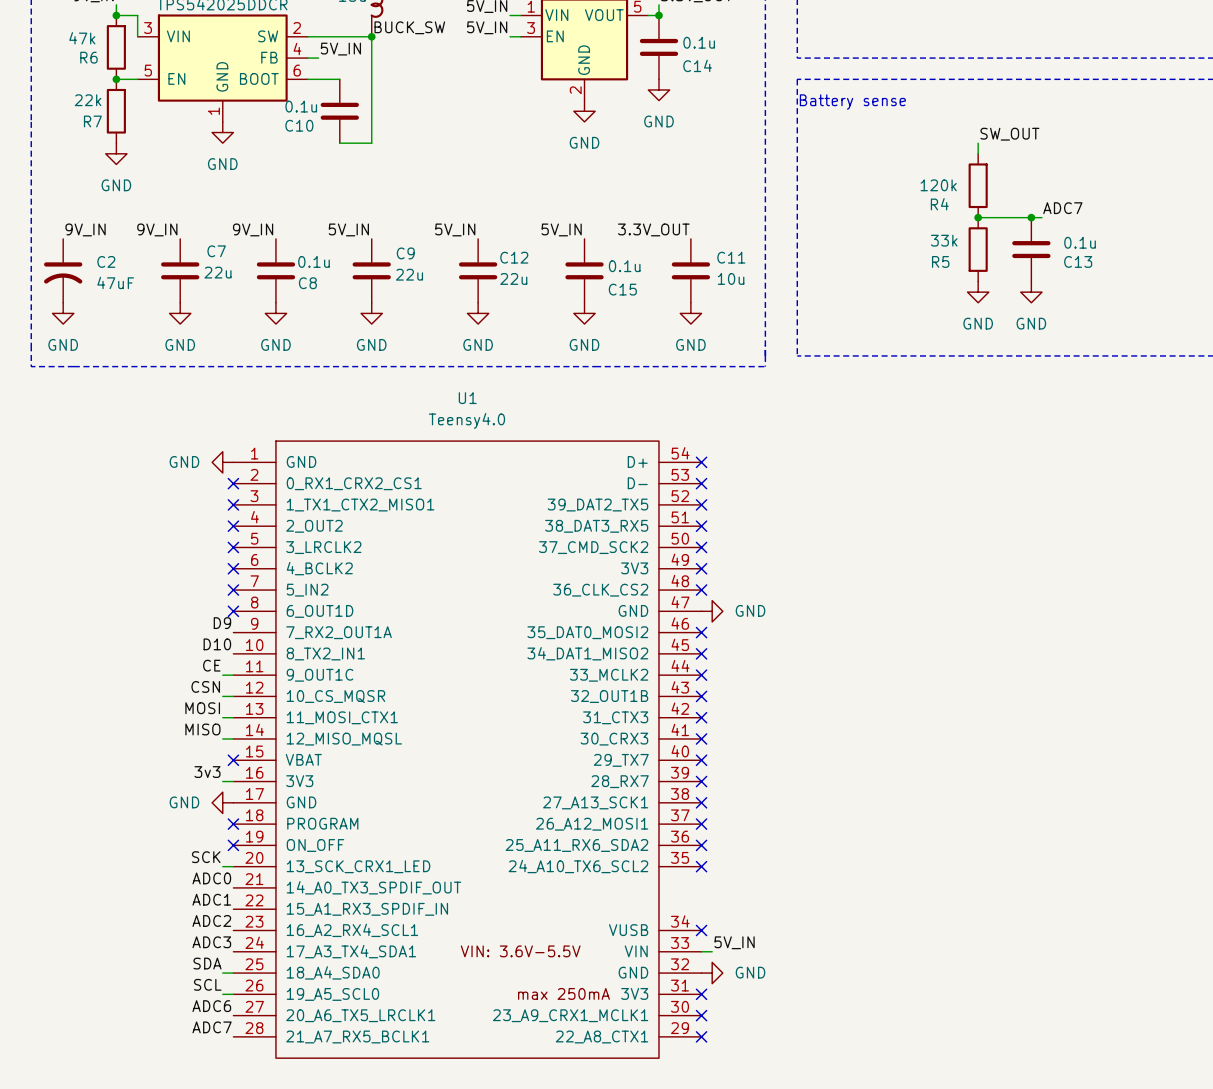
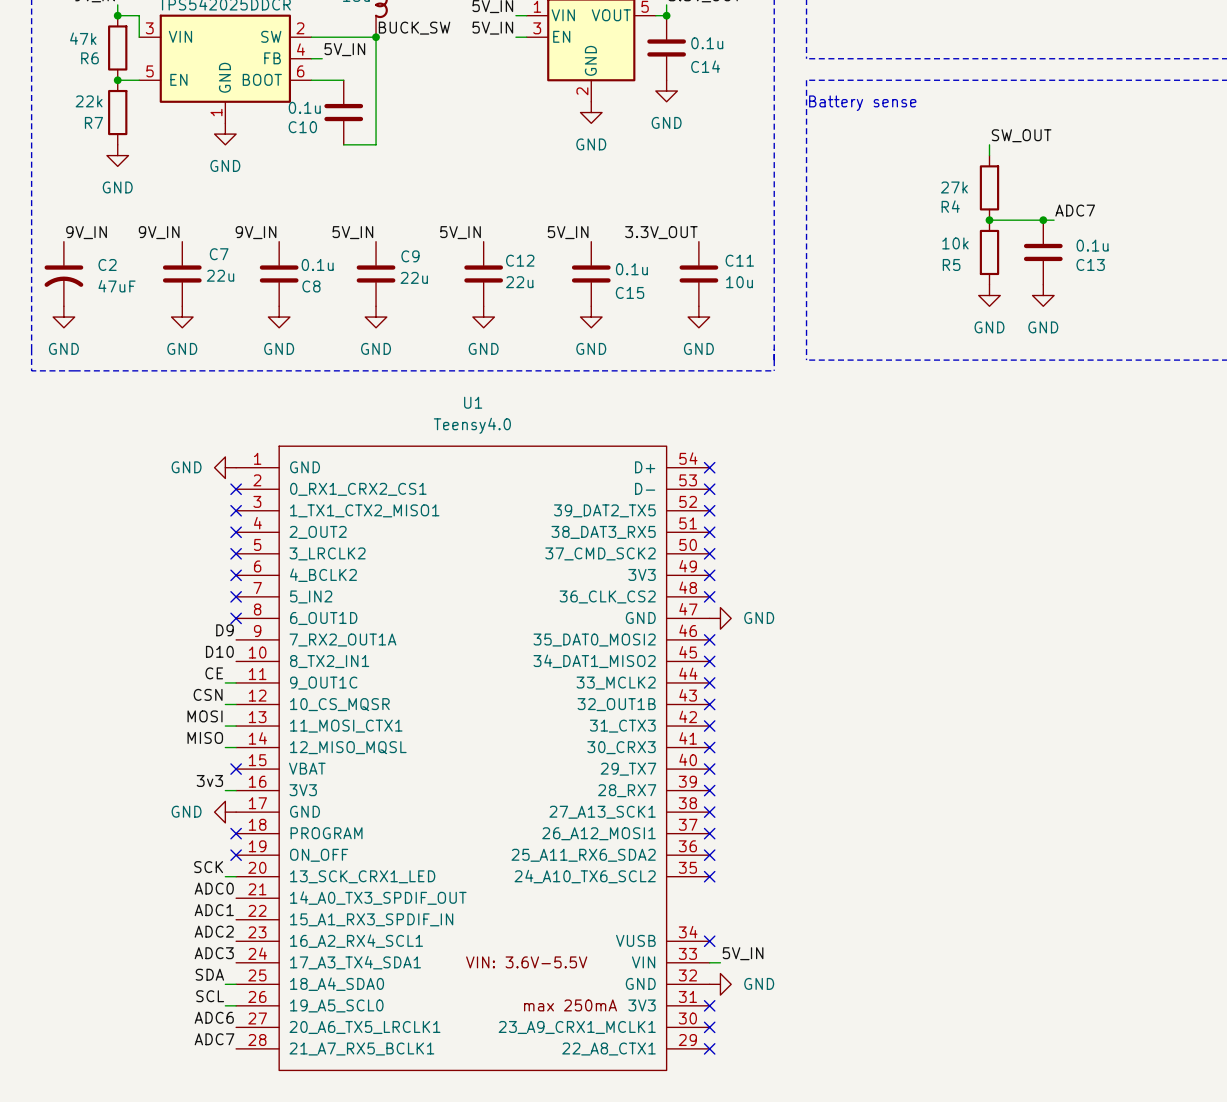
R4 value: 120k (938, 185) -> 27k (954, 187)
R5 value: 33k (944, 240) -> 10k (955, 243)

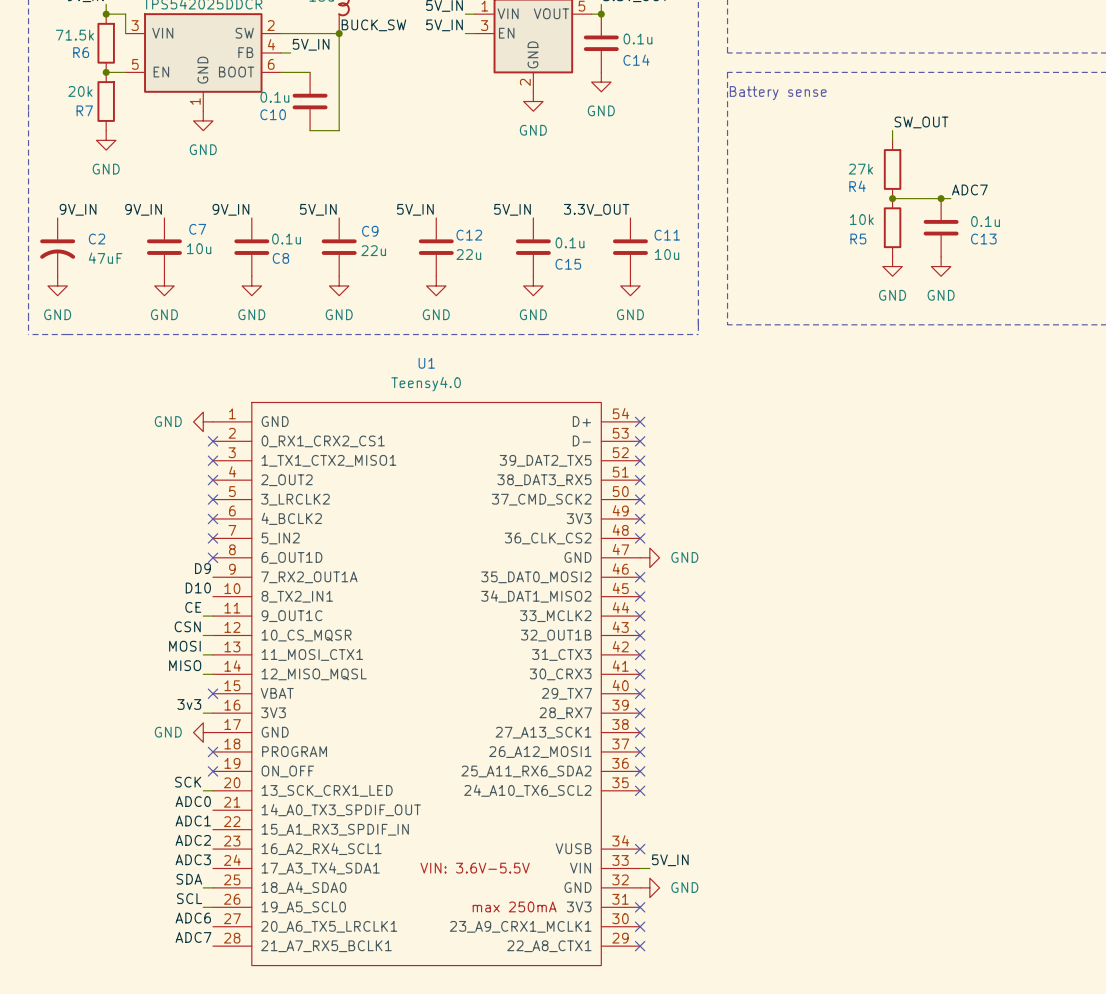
R6 value: 47k (83, 38) -> 71.5k (74, 35)
R7 value: 22k (89, 101) -> 20k (80, 91)
C7 value: 22u (220, 275) -> 10u (199, 248)

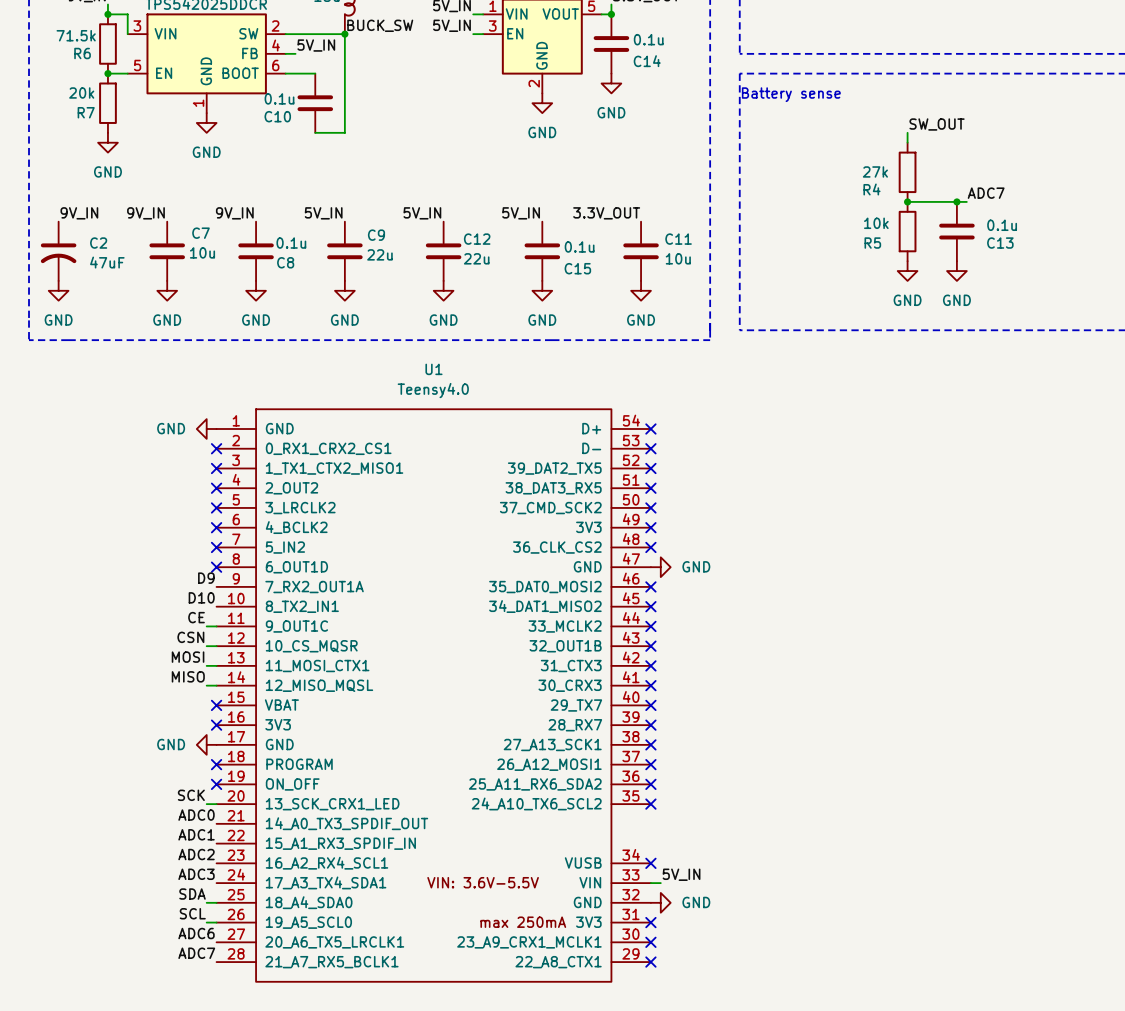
label: 3v3 (189, 704) -> none
wire: (203, 713) (212, 713) -> none
no-connect mark: none -> (216, 725)

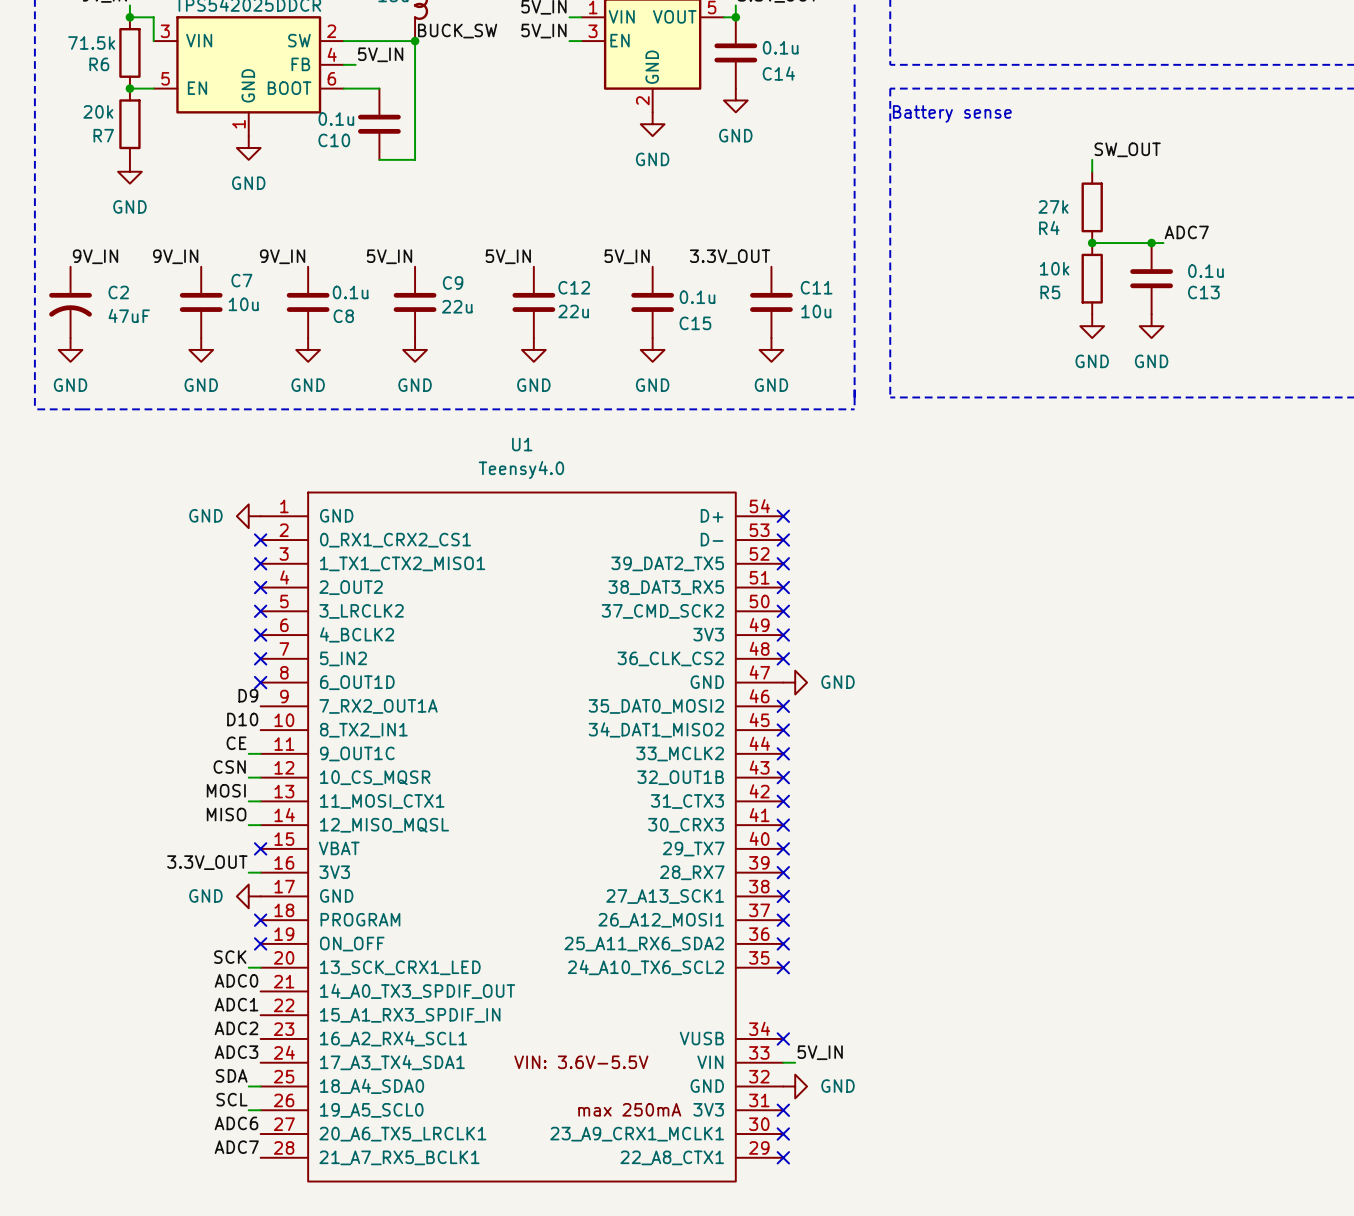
label: none -> 3.3V_OUT (207, 862)
wire: none -> (248, 872) (260, 872)
no-connect mark: (216, 725) -> none

